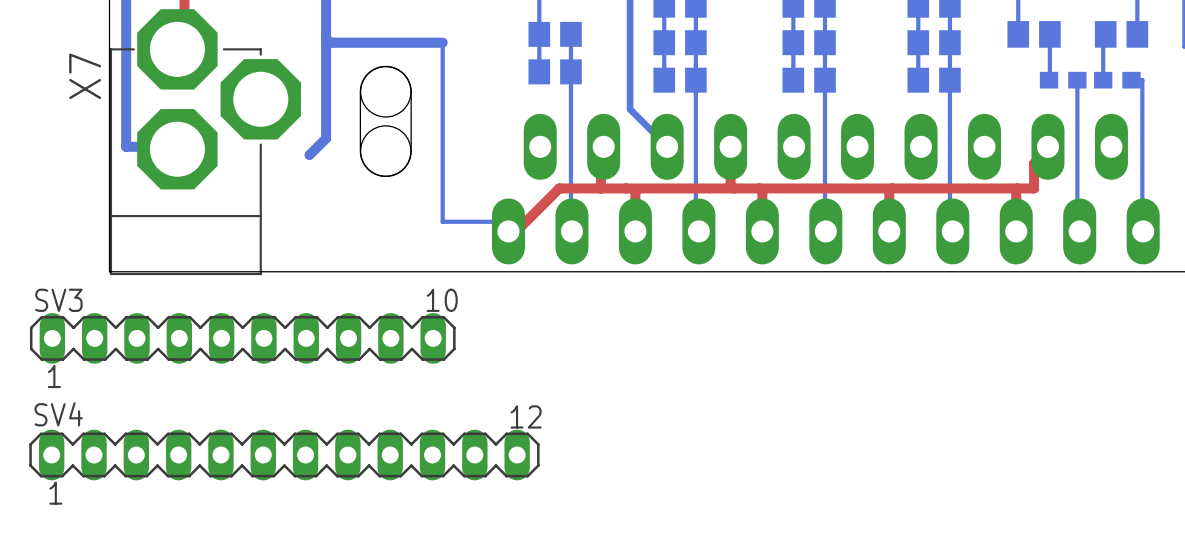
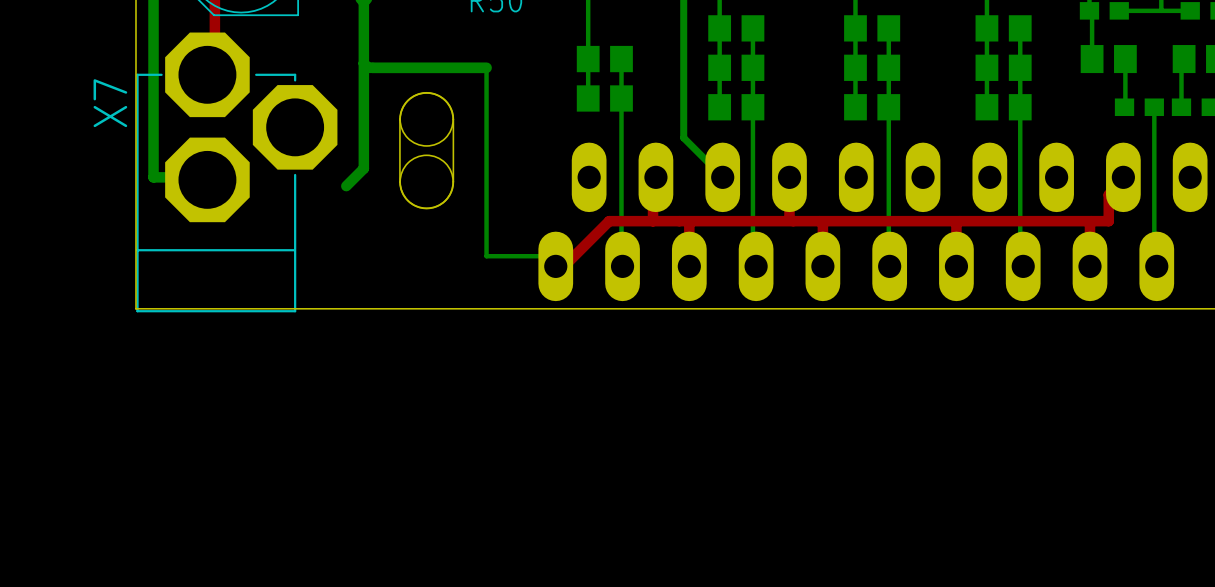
SV3: (242, 338) -> none
SV4: (284, 455) -> none

